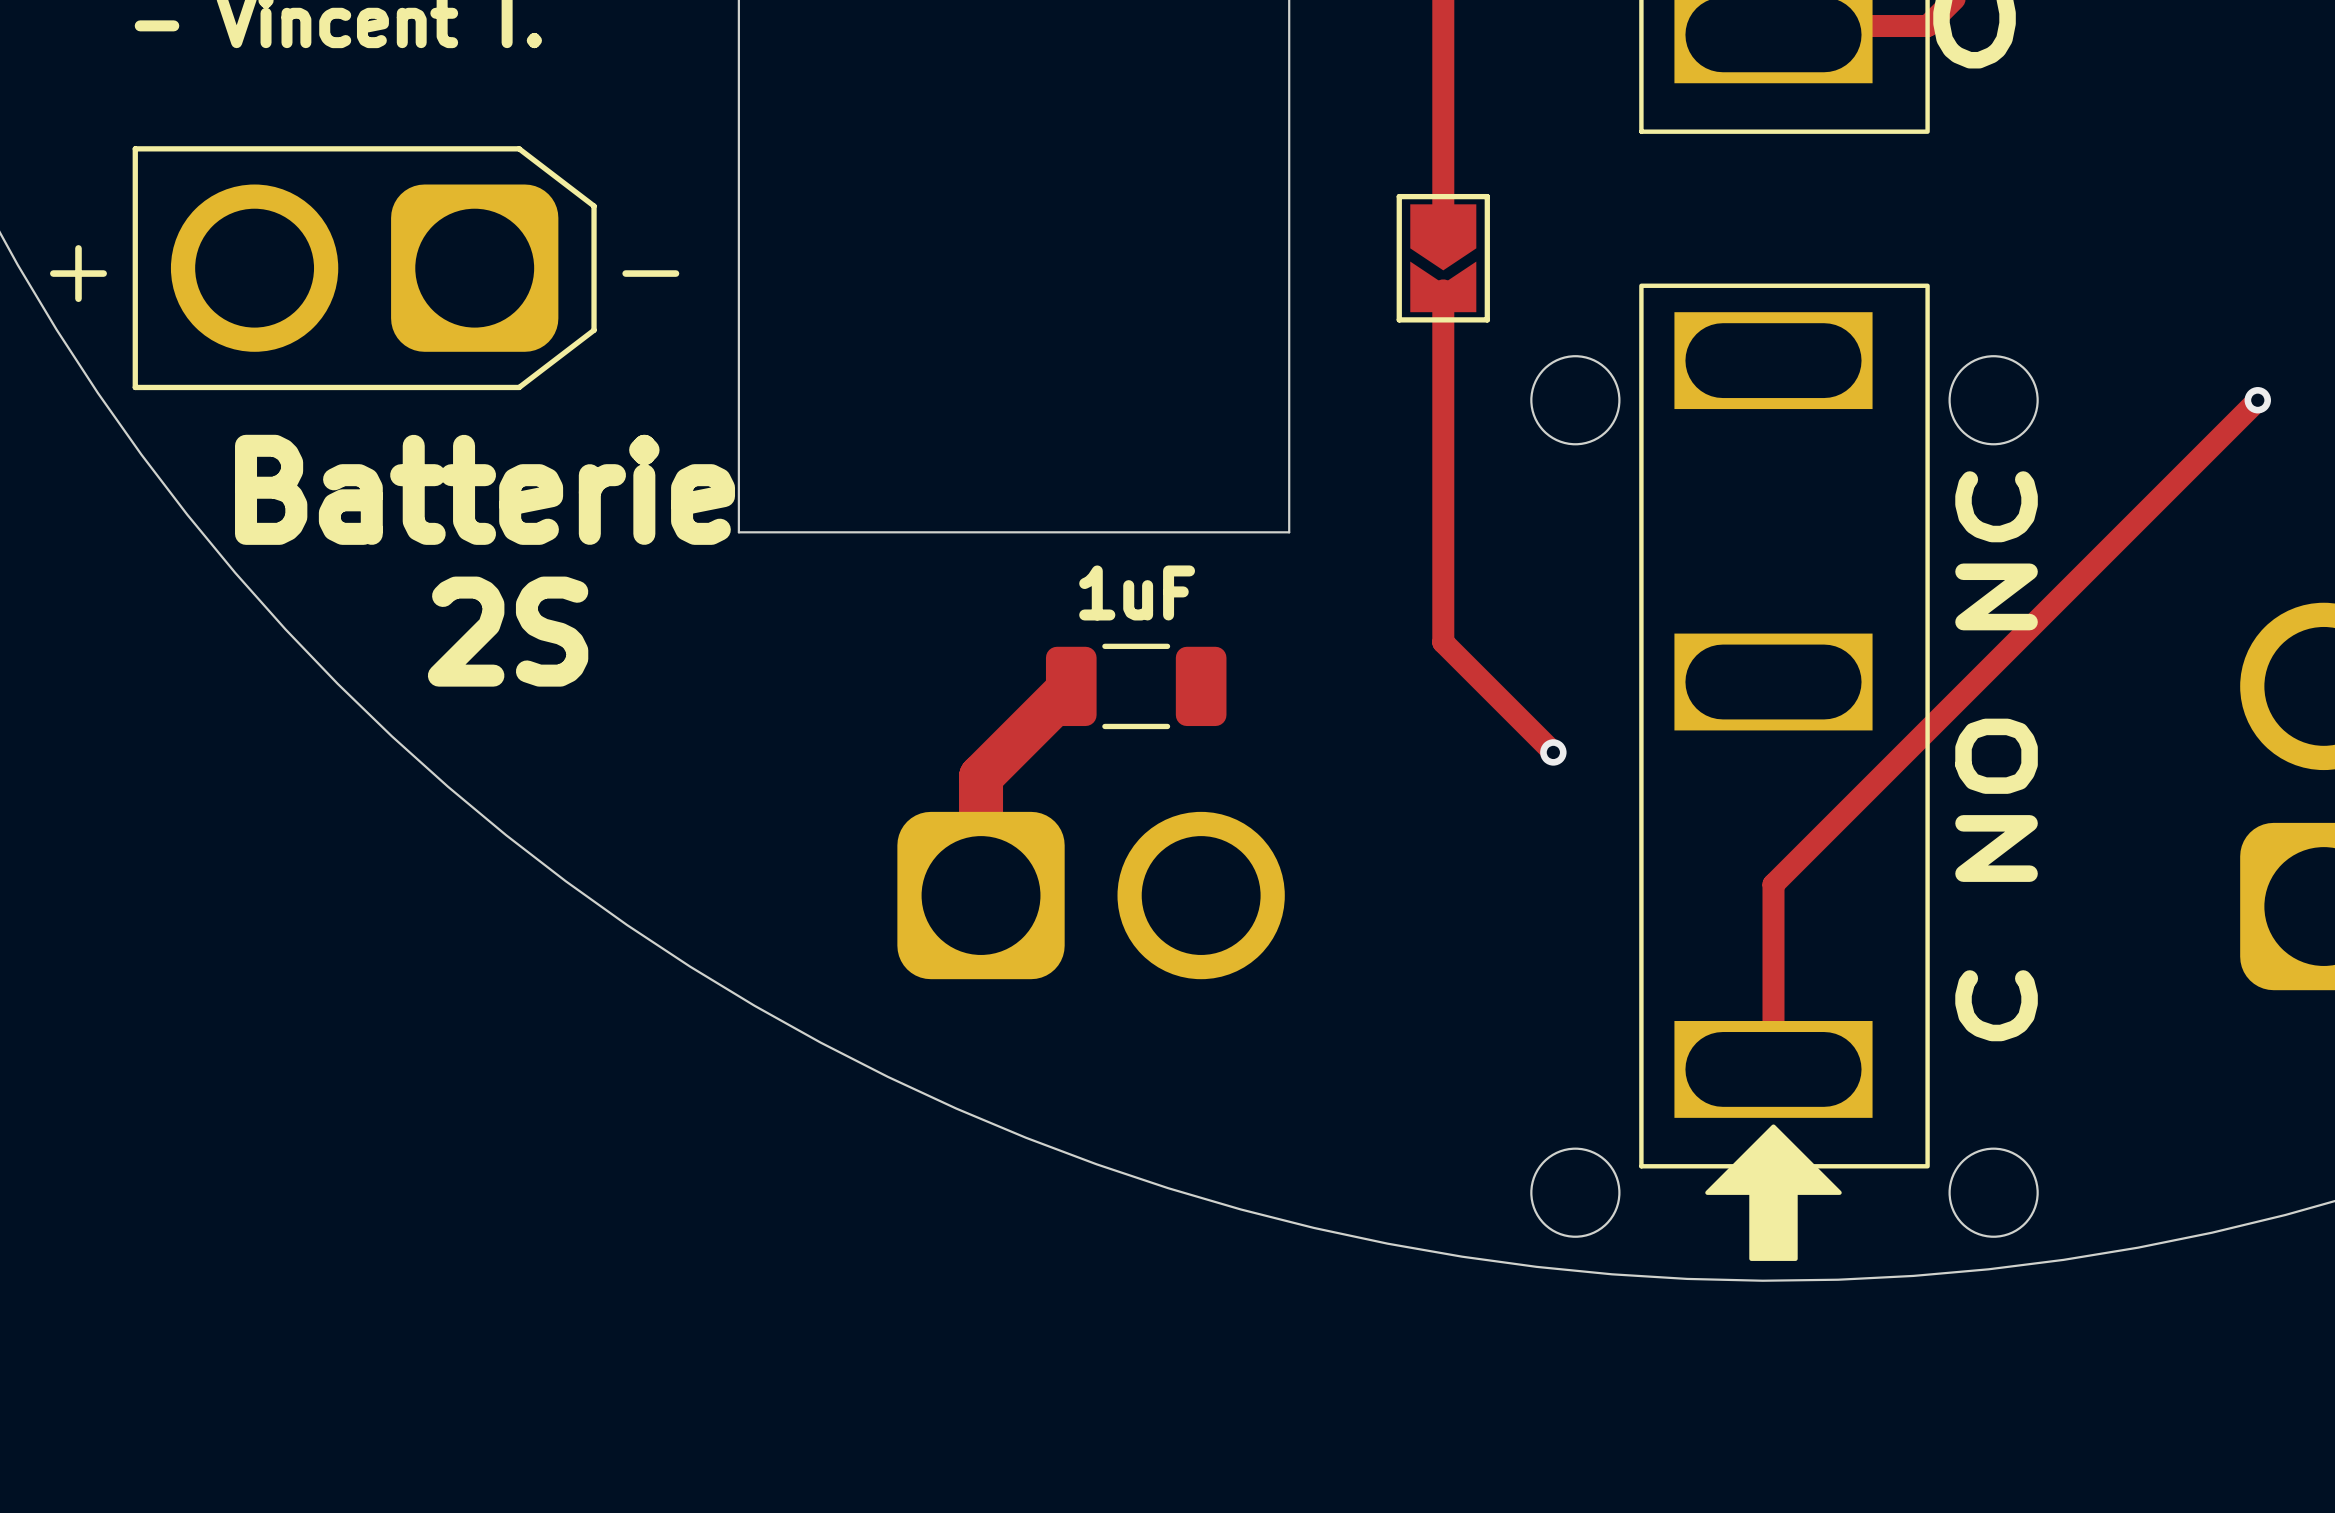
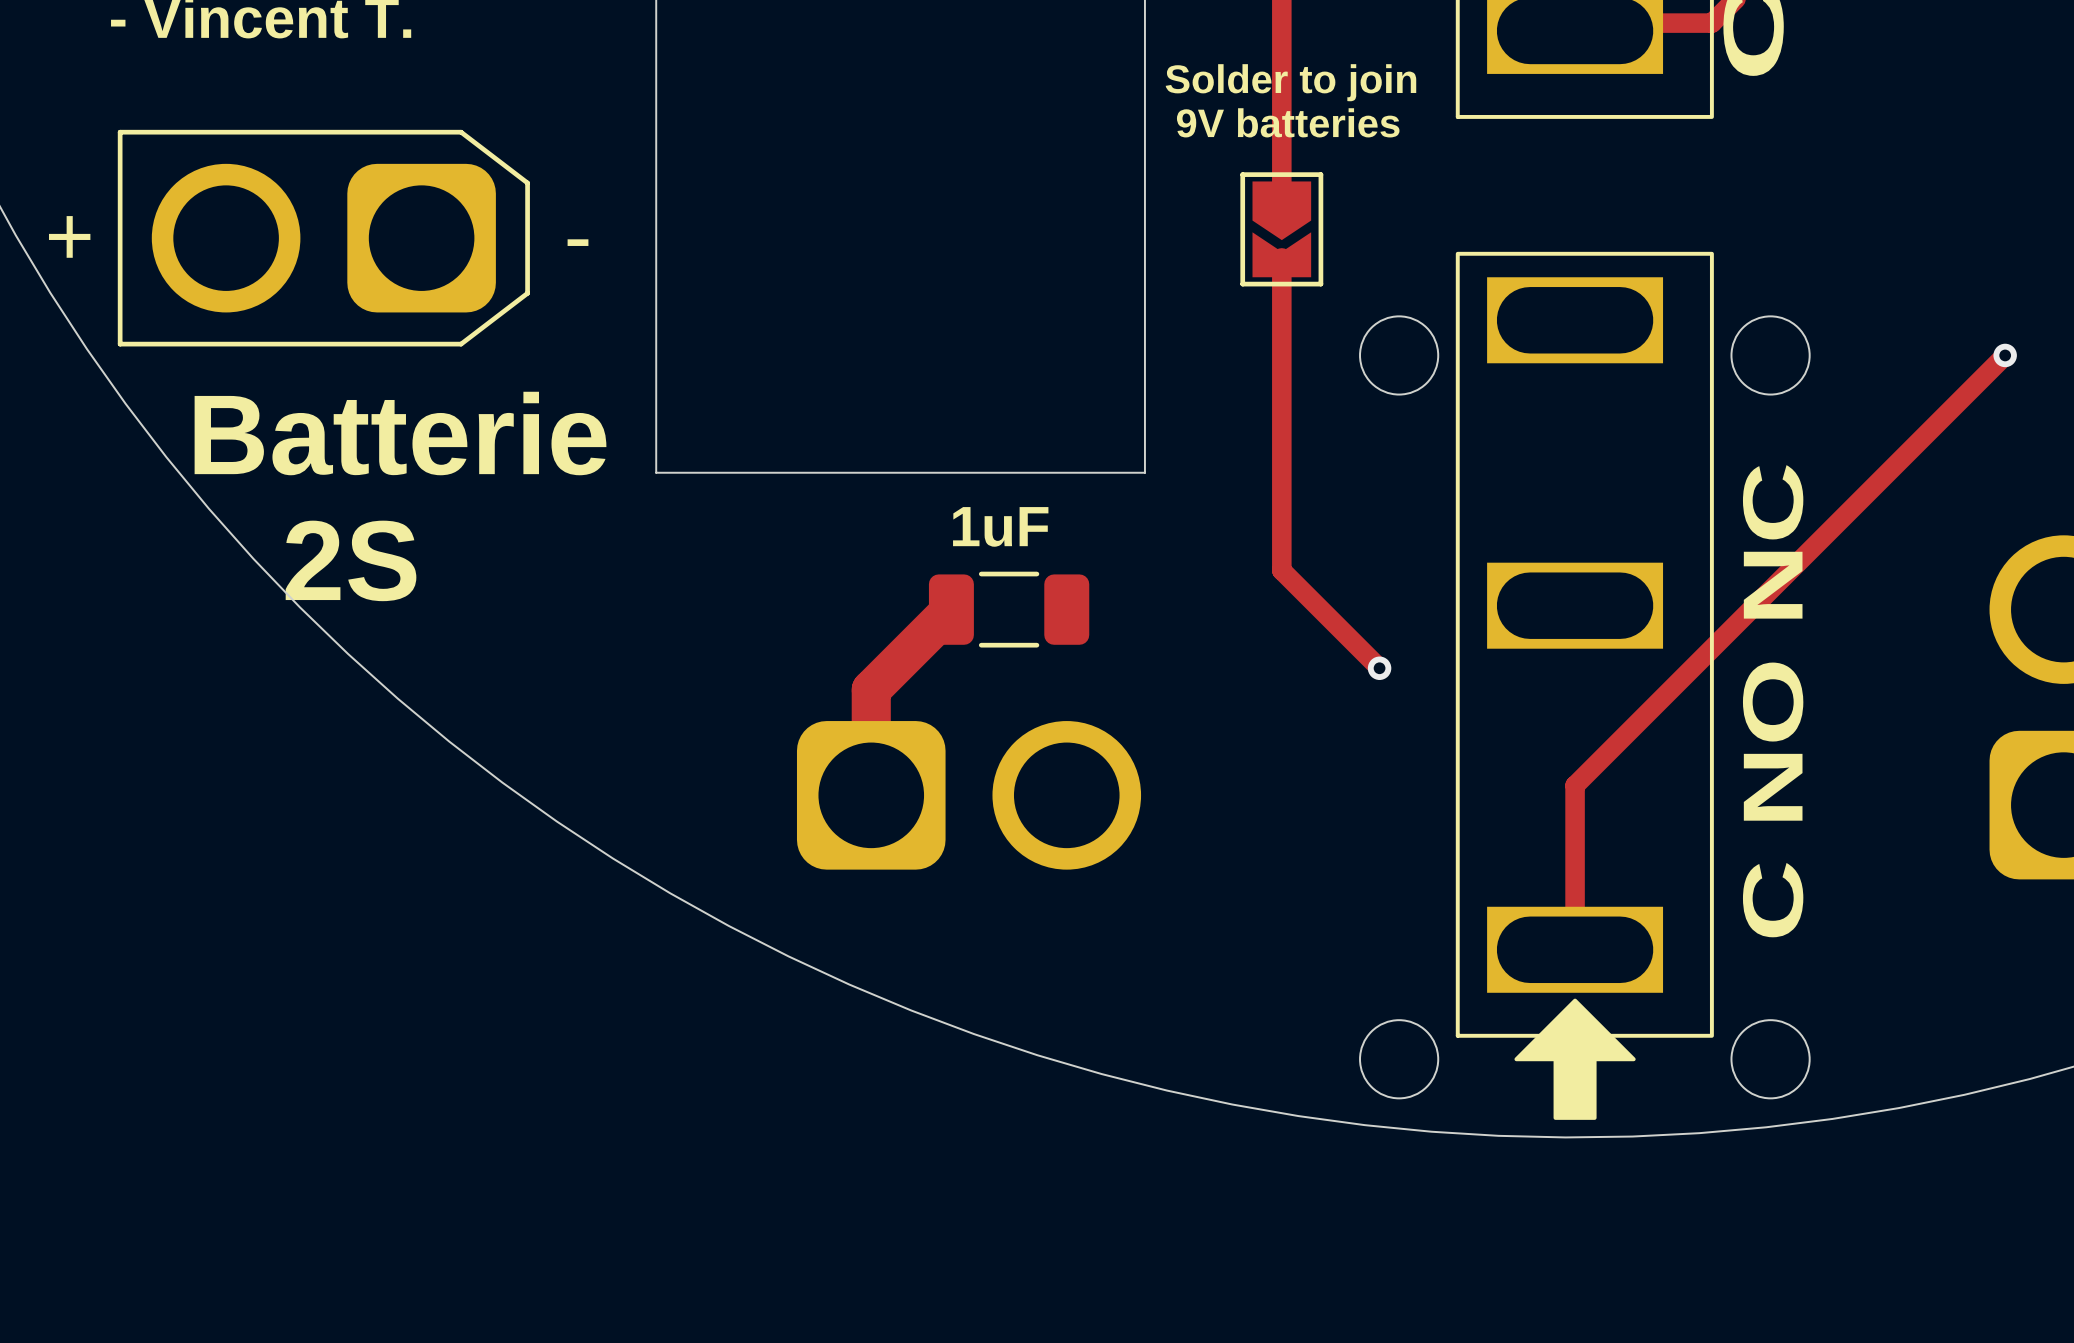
text: none -> Solder to join (1290, 82)
text: none -> 9V batteries (1288, 122)

